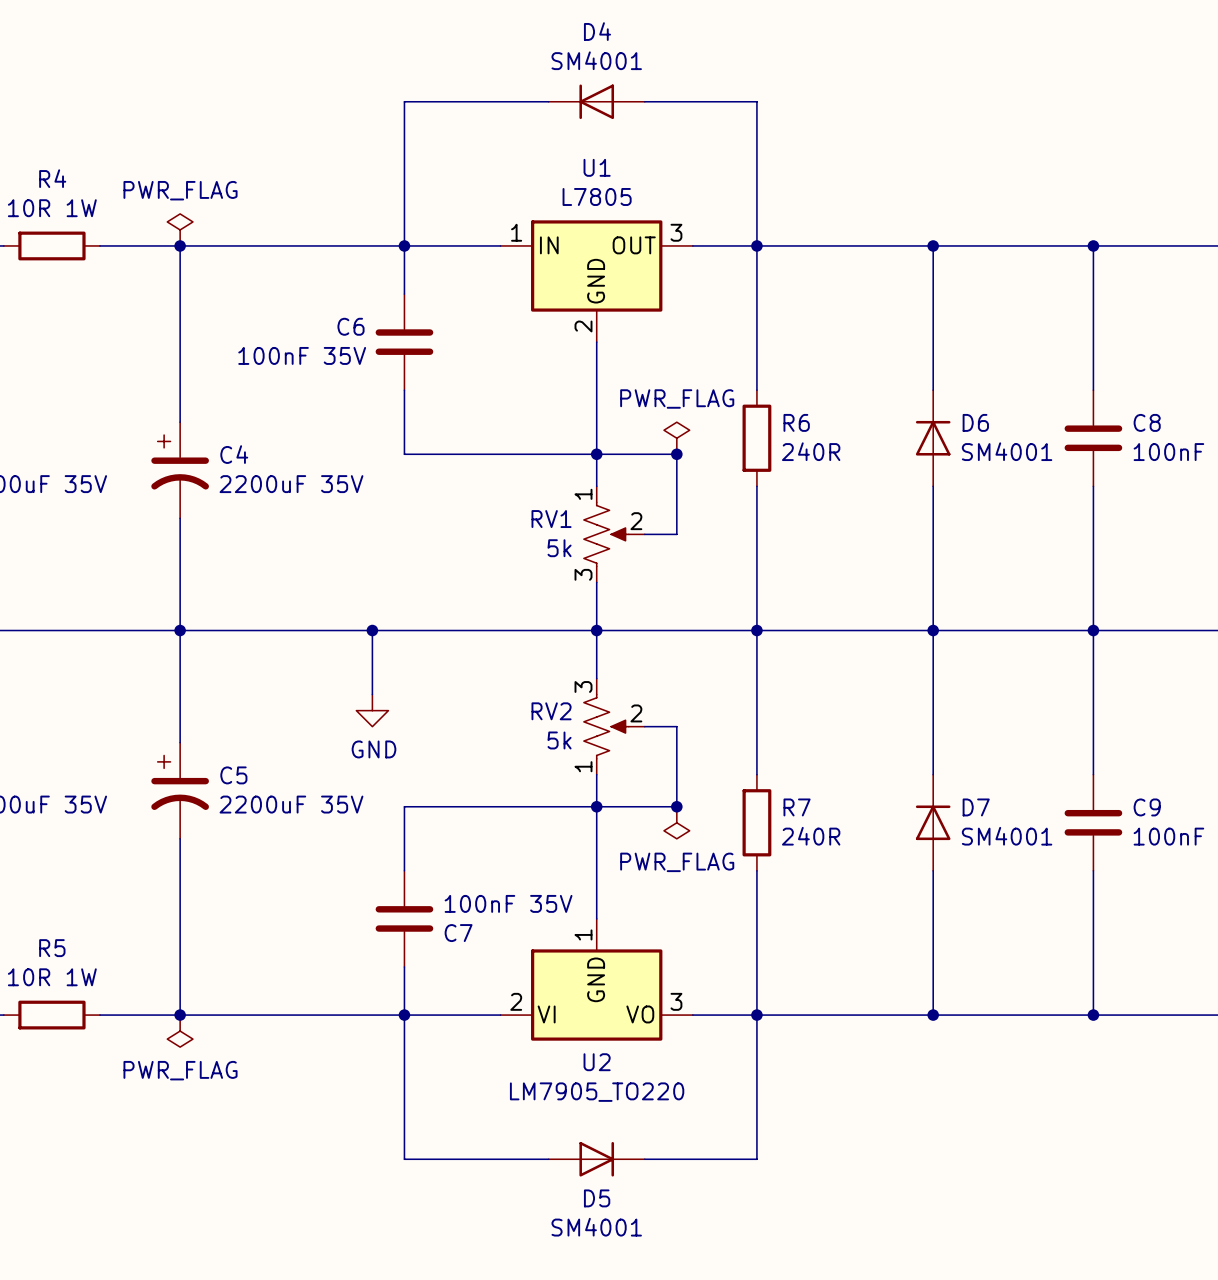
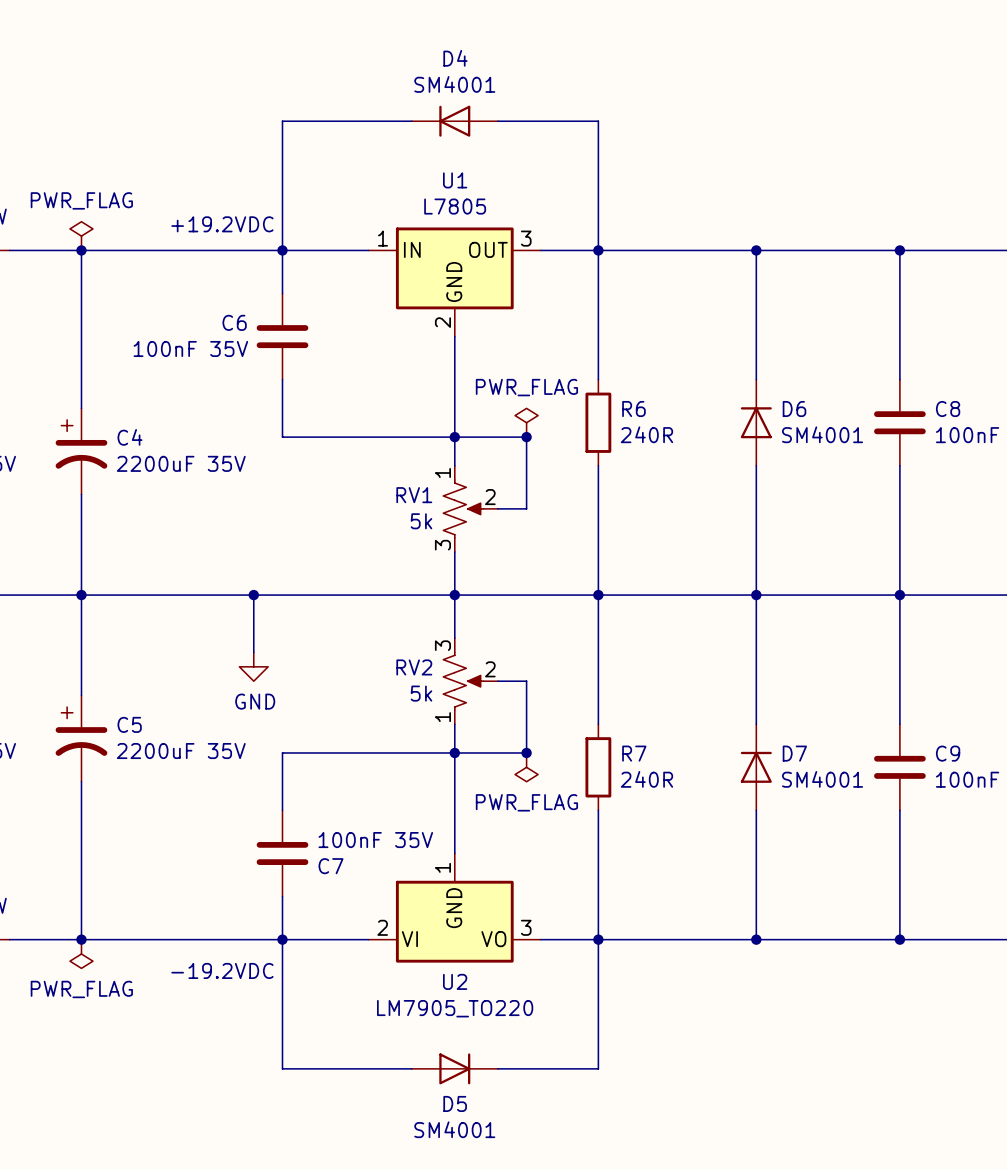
text: none -> +19.2VDC (222, 224)
text: none -> -19.2VDC (222, 970)

